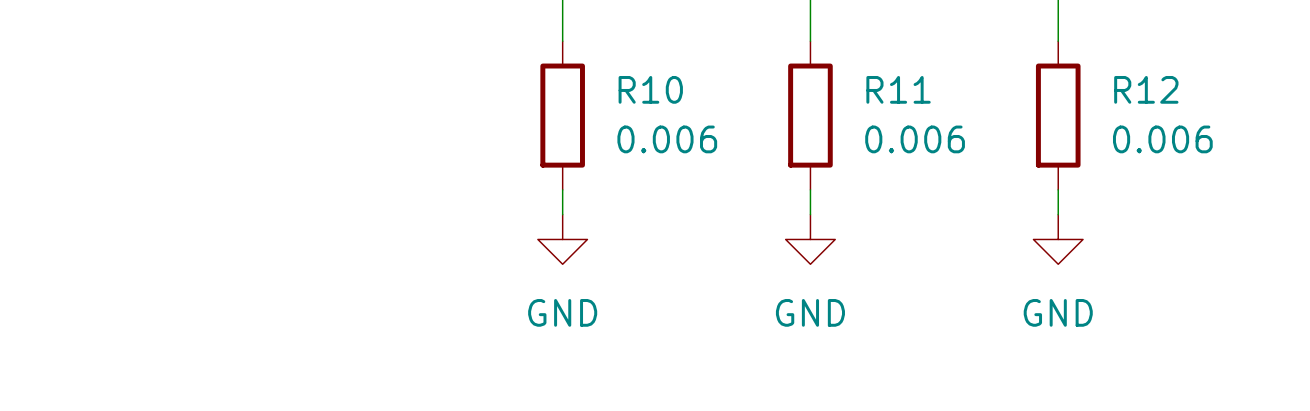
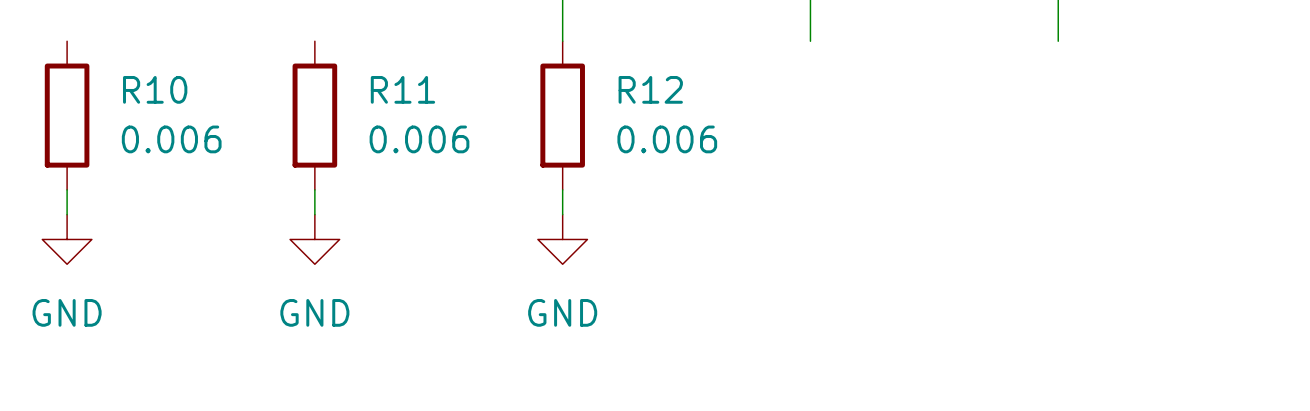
R10 name: R10 (650, 89) -> R12 (650, 89)
R10: none -> 0.006 (67, 115)
R11 position: (810, 115) -> (314, 115)
R12: 0.006 (1058, 115) -> none
wire: none -> (67, 189) (67, 214)
wire: none -> (314, 189) (314, 214)
wire: (810, 189) (810, 214) -> none
wire: (1058, 189) (1058, 214) -> none
power symbol: none -> GND (67, 239)
power symbol: none -> GND (314, 239)
power symbol: GND (810, 239) -> none
power symbol: GND (1058, 239) -> none

